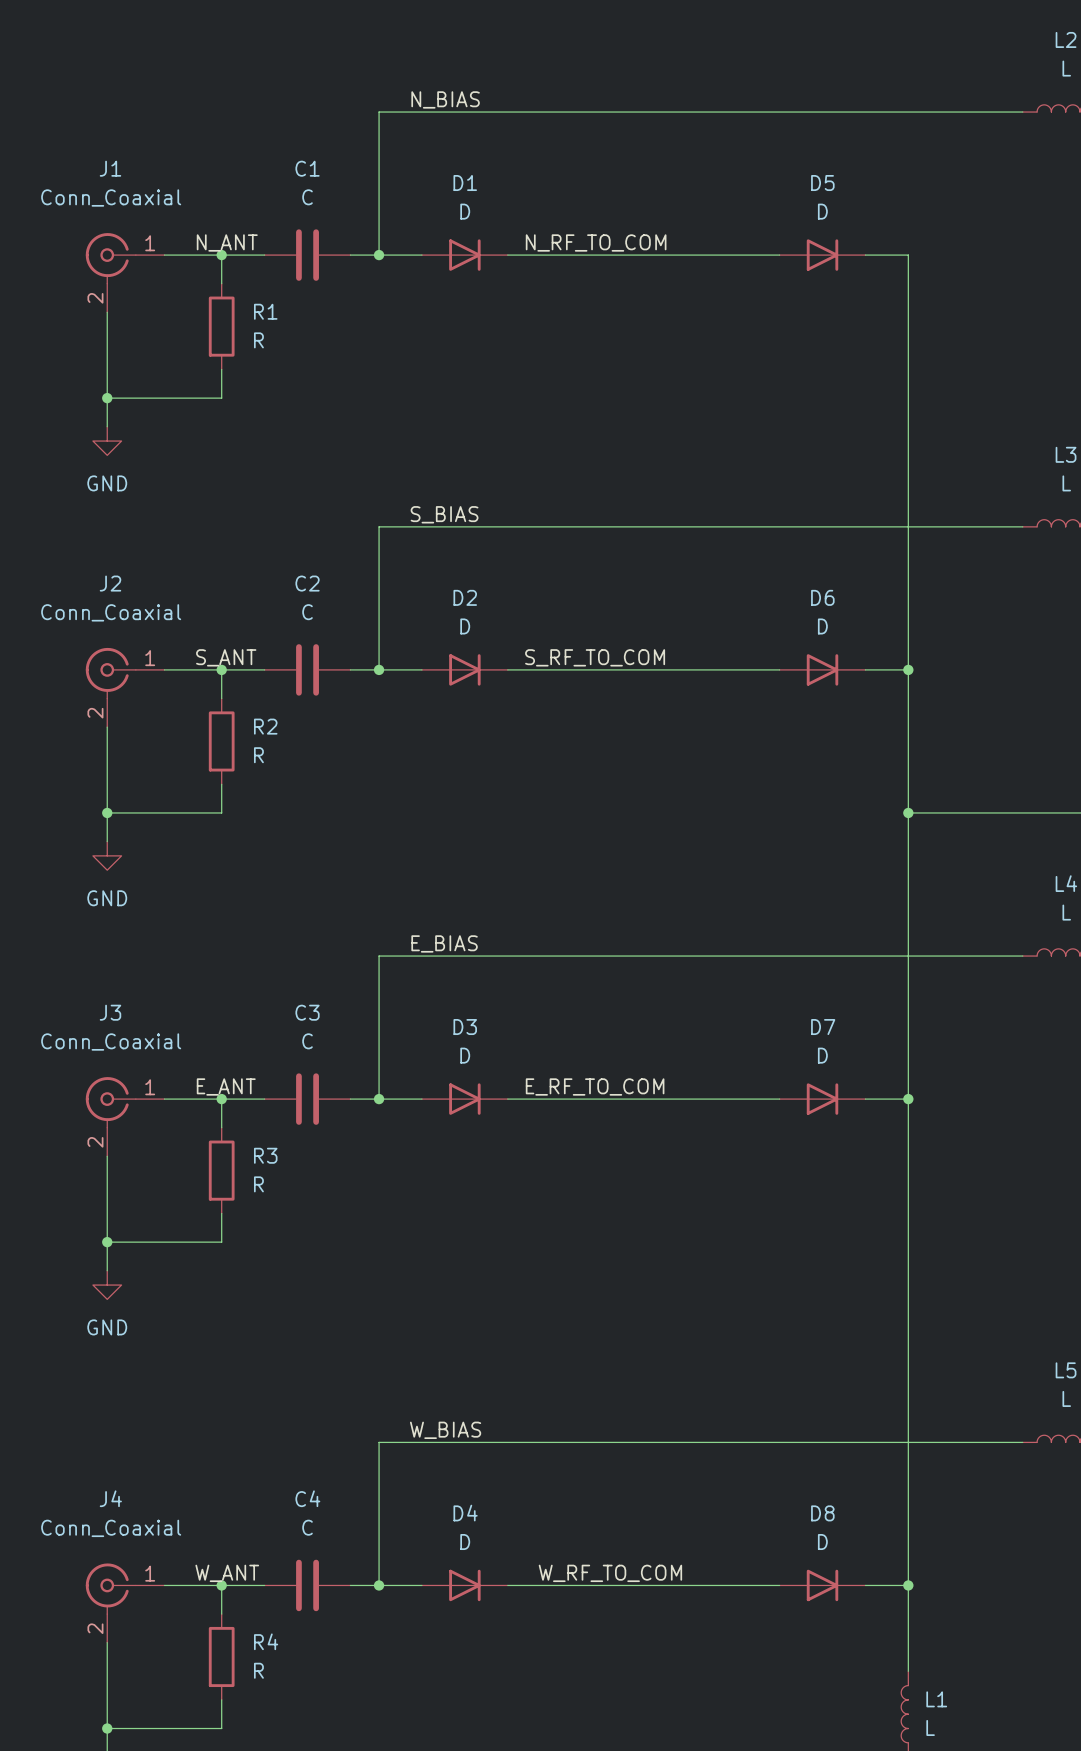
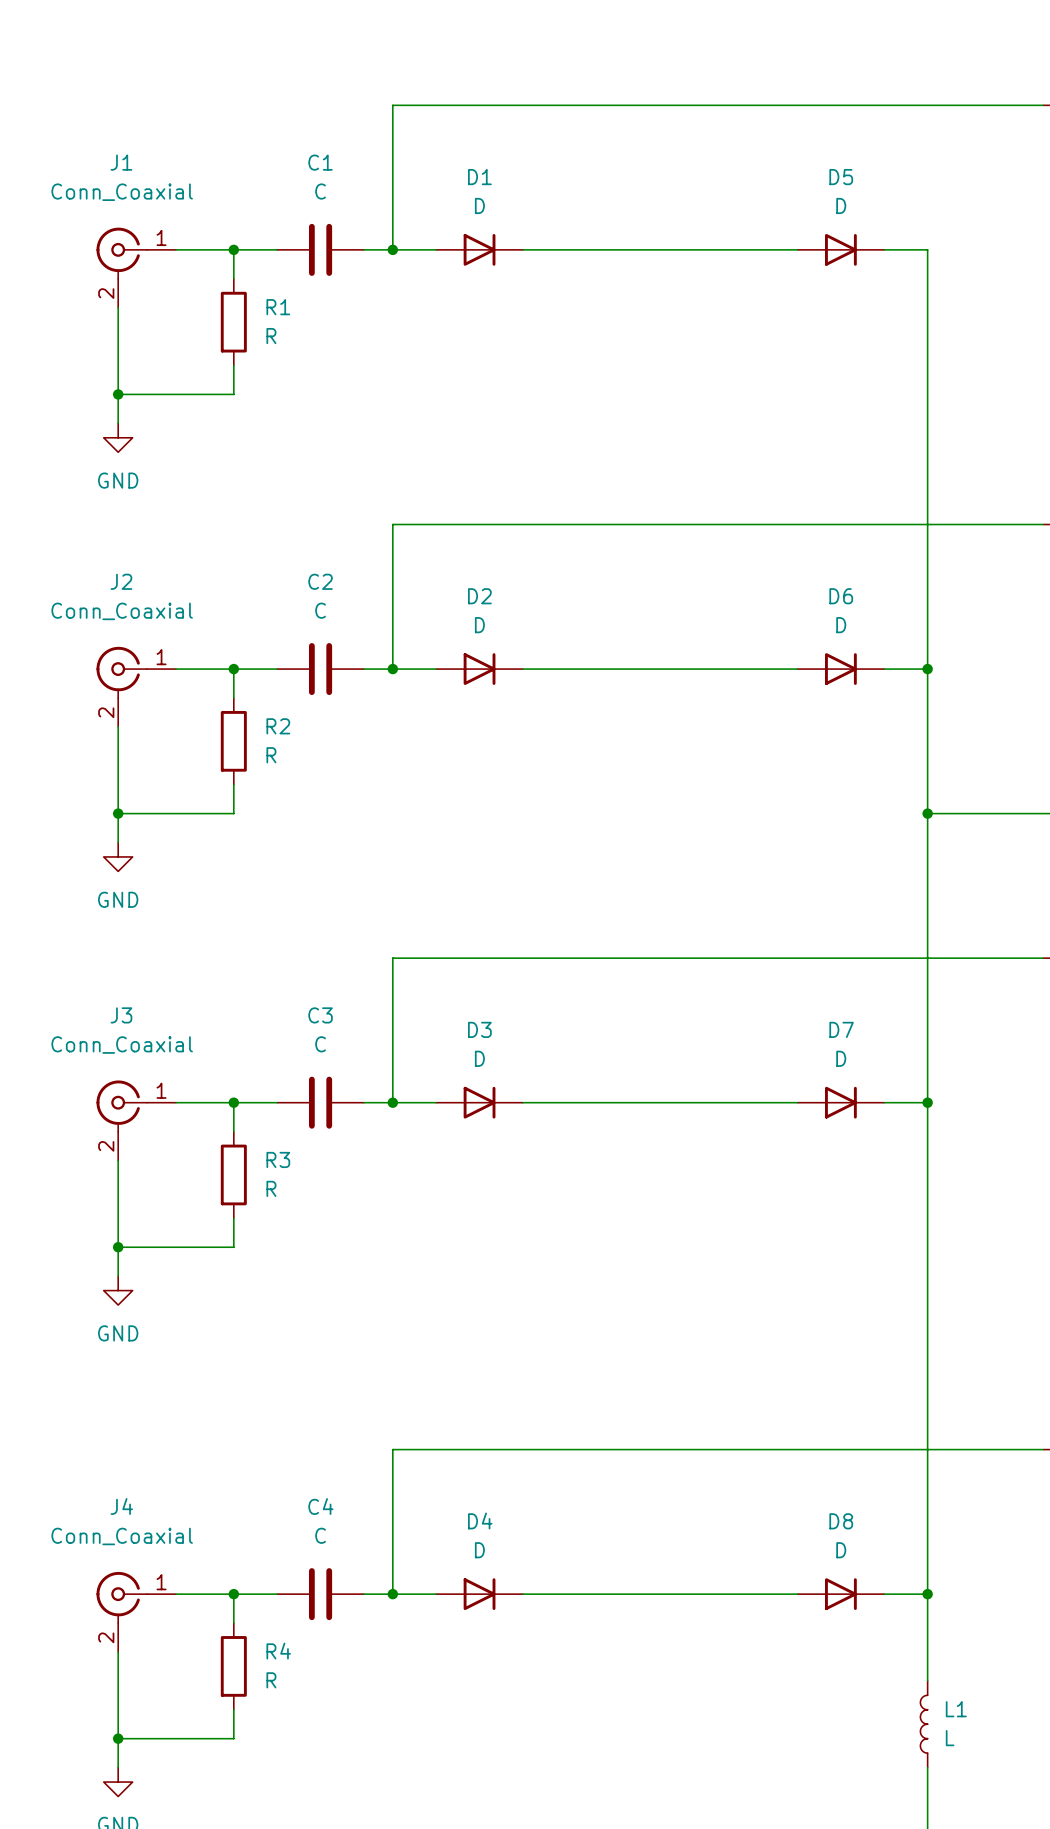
label: N_BIAS (445, 99) -> none
label: N_ANT (227, 242) -> none
label: N_RF_TO_COM (596, 242) -> none
label: S_BIAS (444, 514) -> none
label: S_ANT (226, 657) -> none
label: S_RF_TO_COM (595, 657) -> none
label: E_BIAS (444, 943) -> none
label: E_ANT (226, 1087) -> none
label: E_RF_TO_COM (595, 1087) -> none
label: W_BIAS (445, 1430) -> none
label: W_ANT (227, 1573) -> none
label: W_RF_TO_COM (610, 1573) -> none

